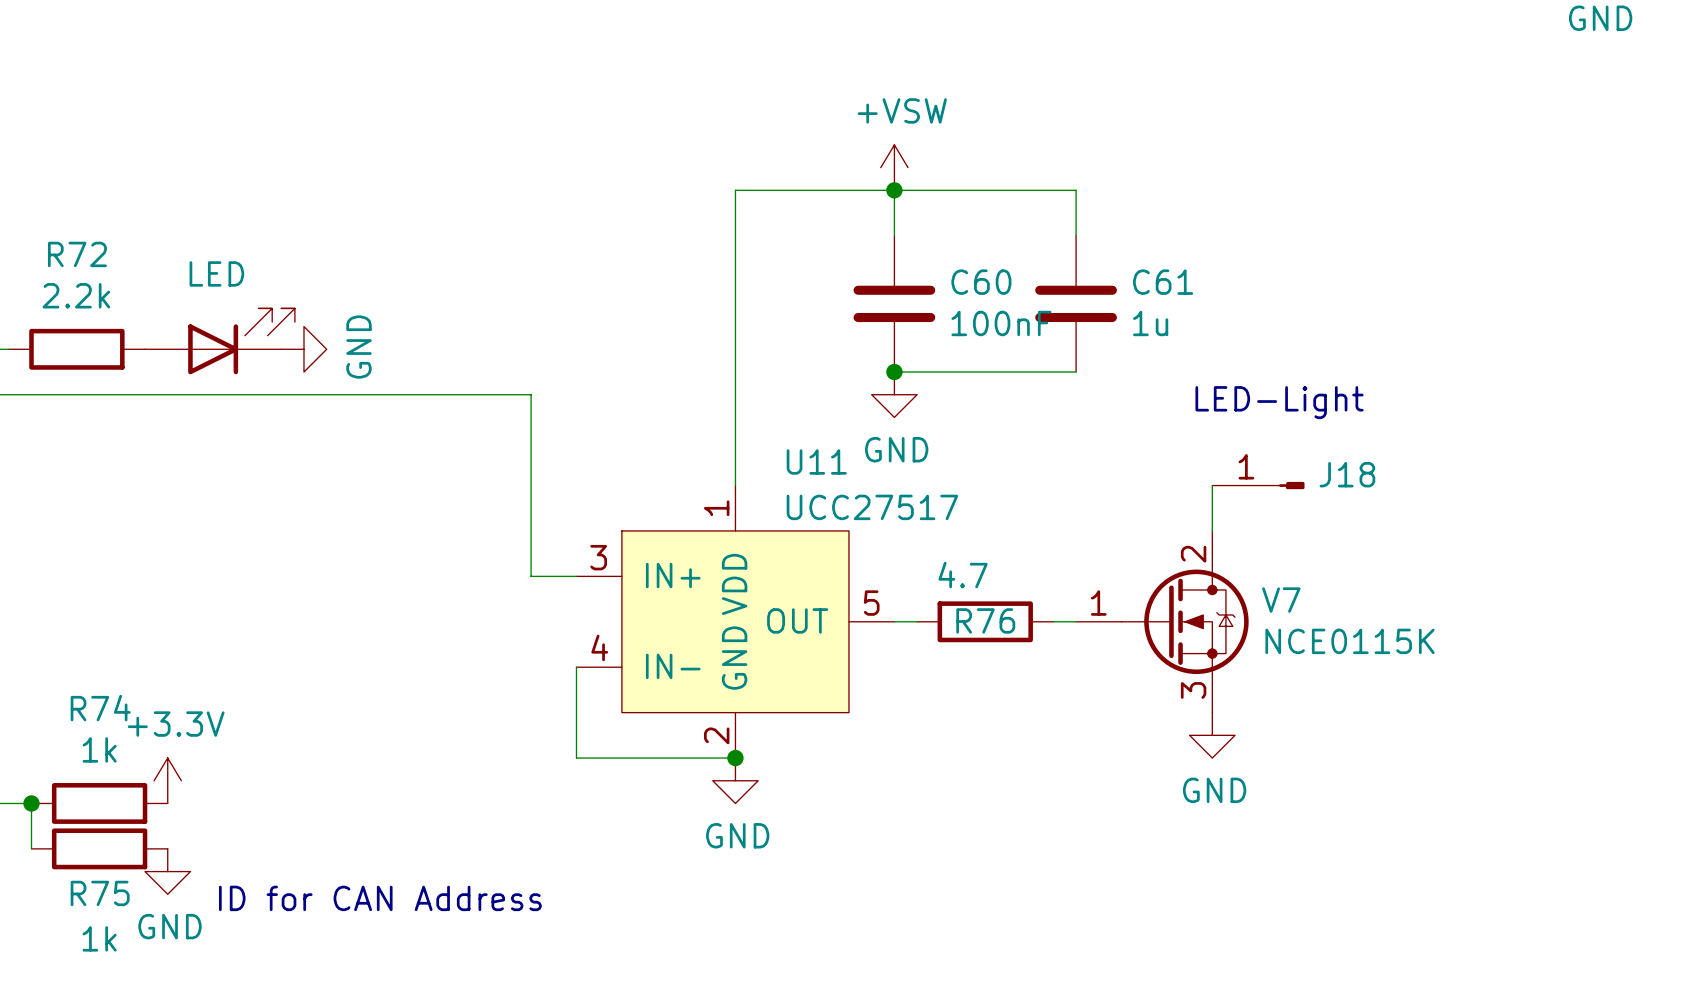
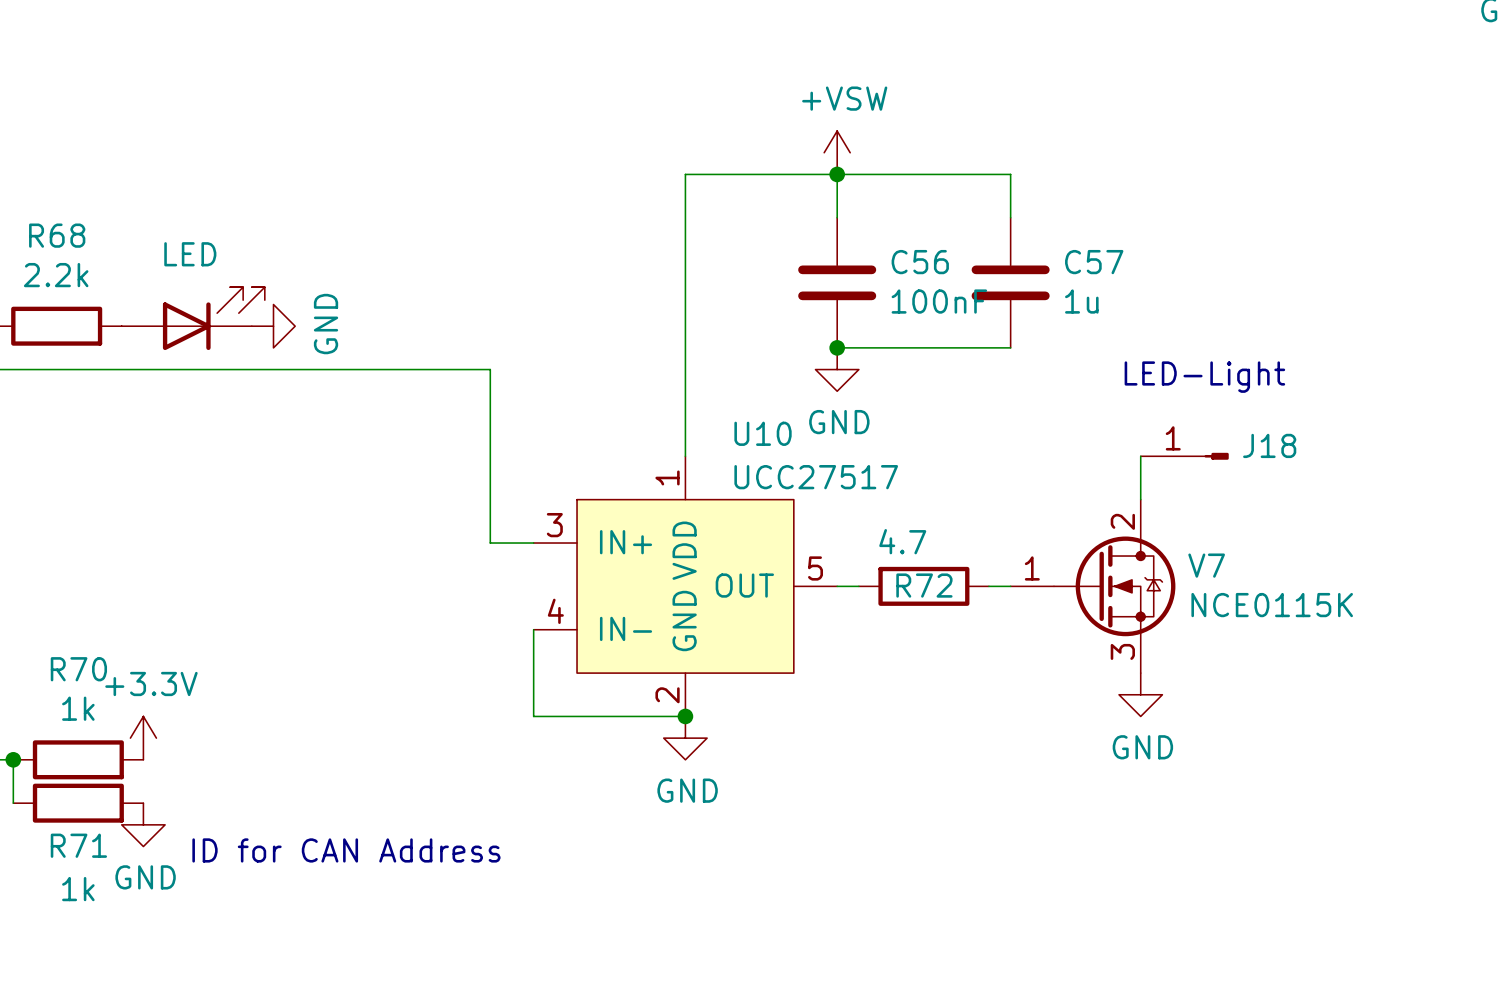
R72 name: R72 (77, 254) -> R68 (57, 235)
C60 name: C60 (981, 282) -> C56 (920, 262)
C61 name: C61 (1163, 282) -> C57 (1094, 262)
U11 name: U11 (816, 461) -> U10 (763, 433)
R76 name: R76 (985, 620) -> R72 (924, 585)
R74 name: R74 (100, 708) -> R70 (78, 669)
R75 name: R75 (100, 893) -> R71 (78, 845)

